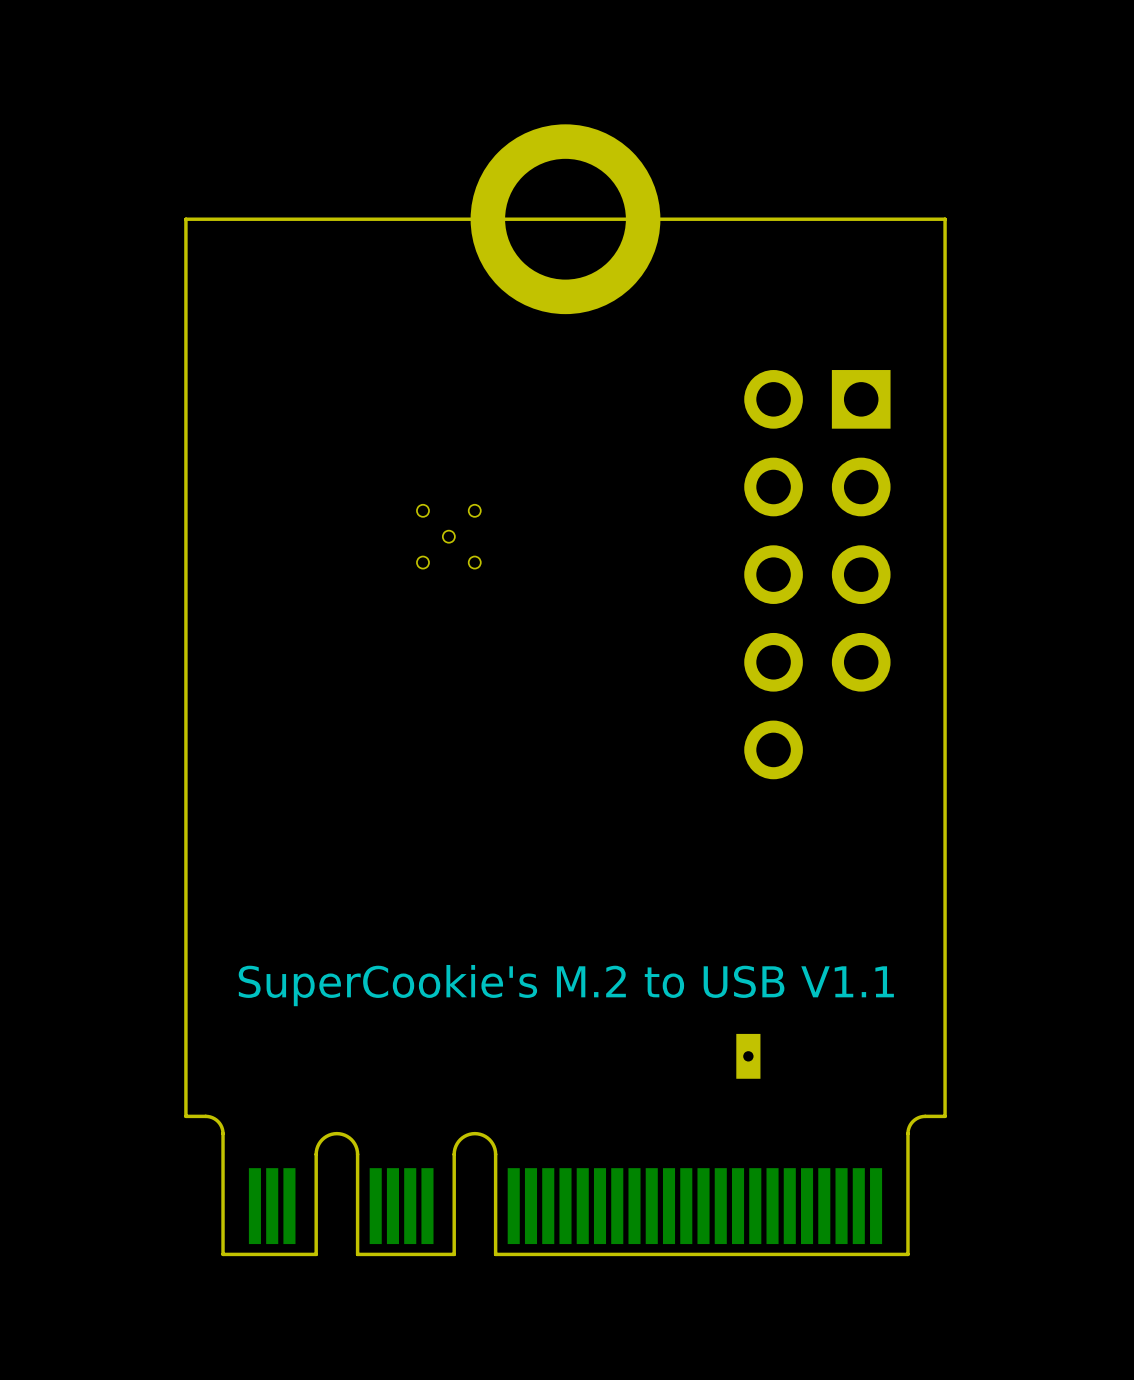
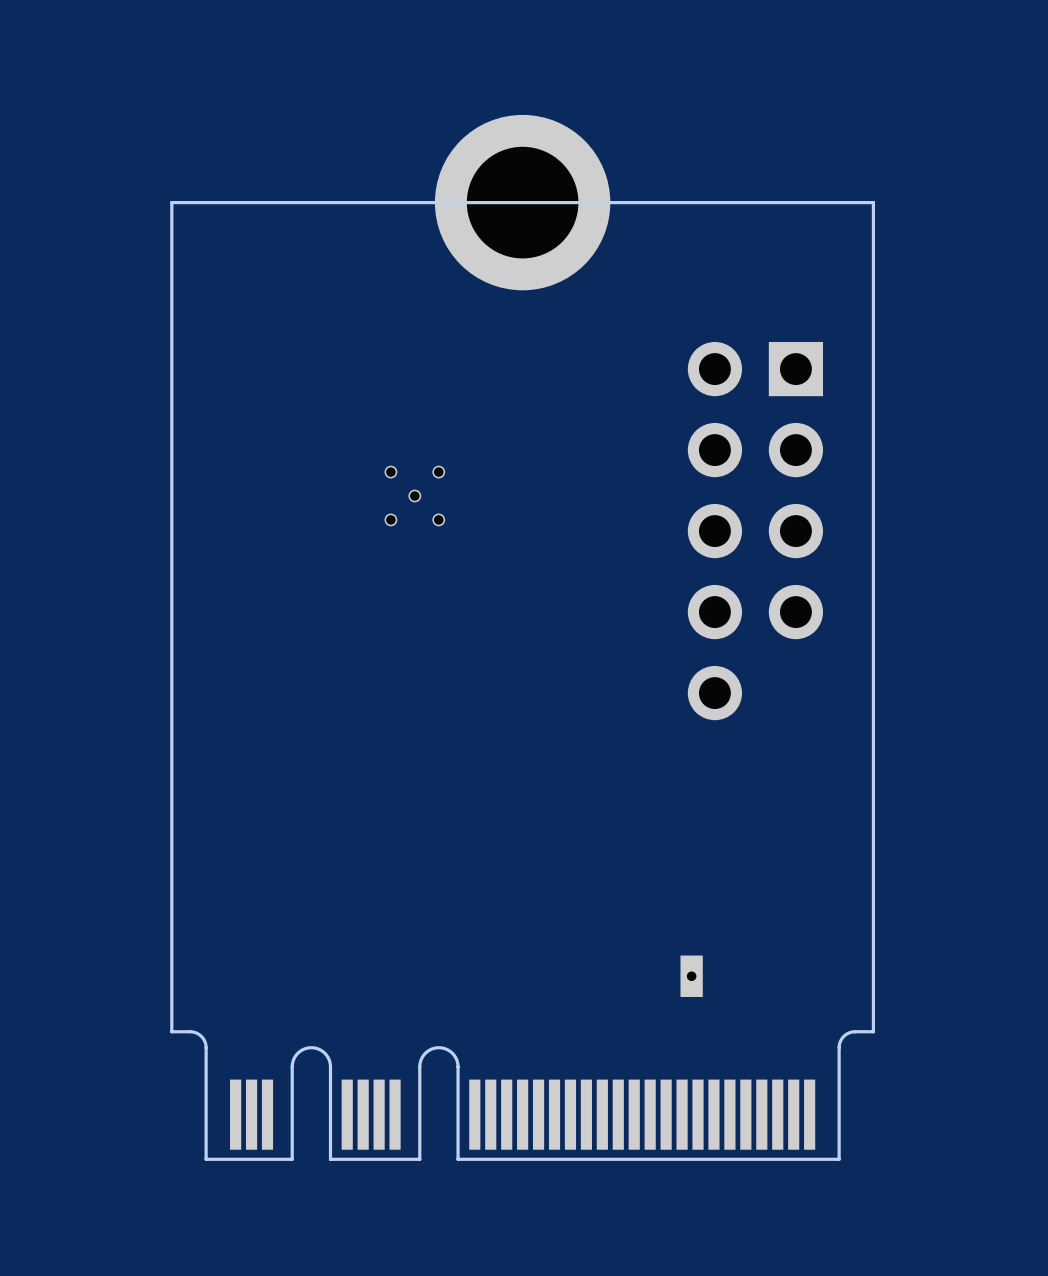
text: SuperCookie's M.2 to USB V1.1 (566, 985) -> none

